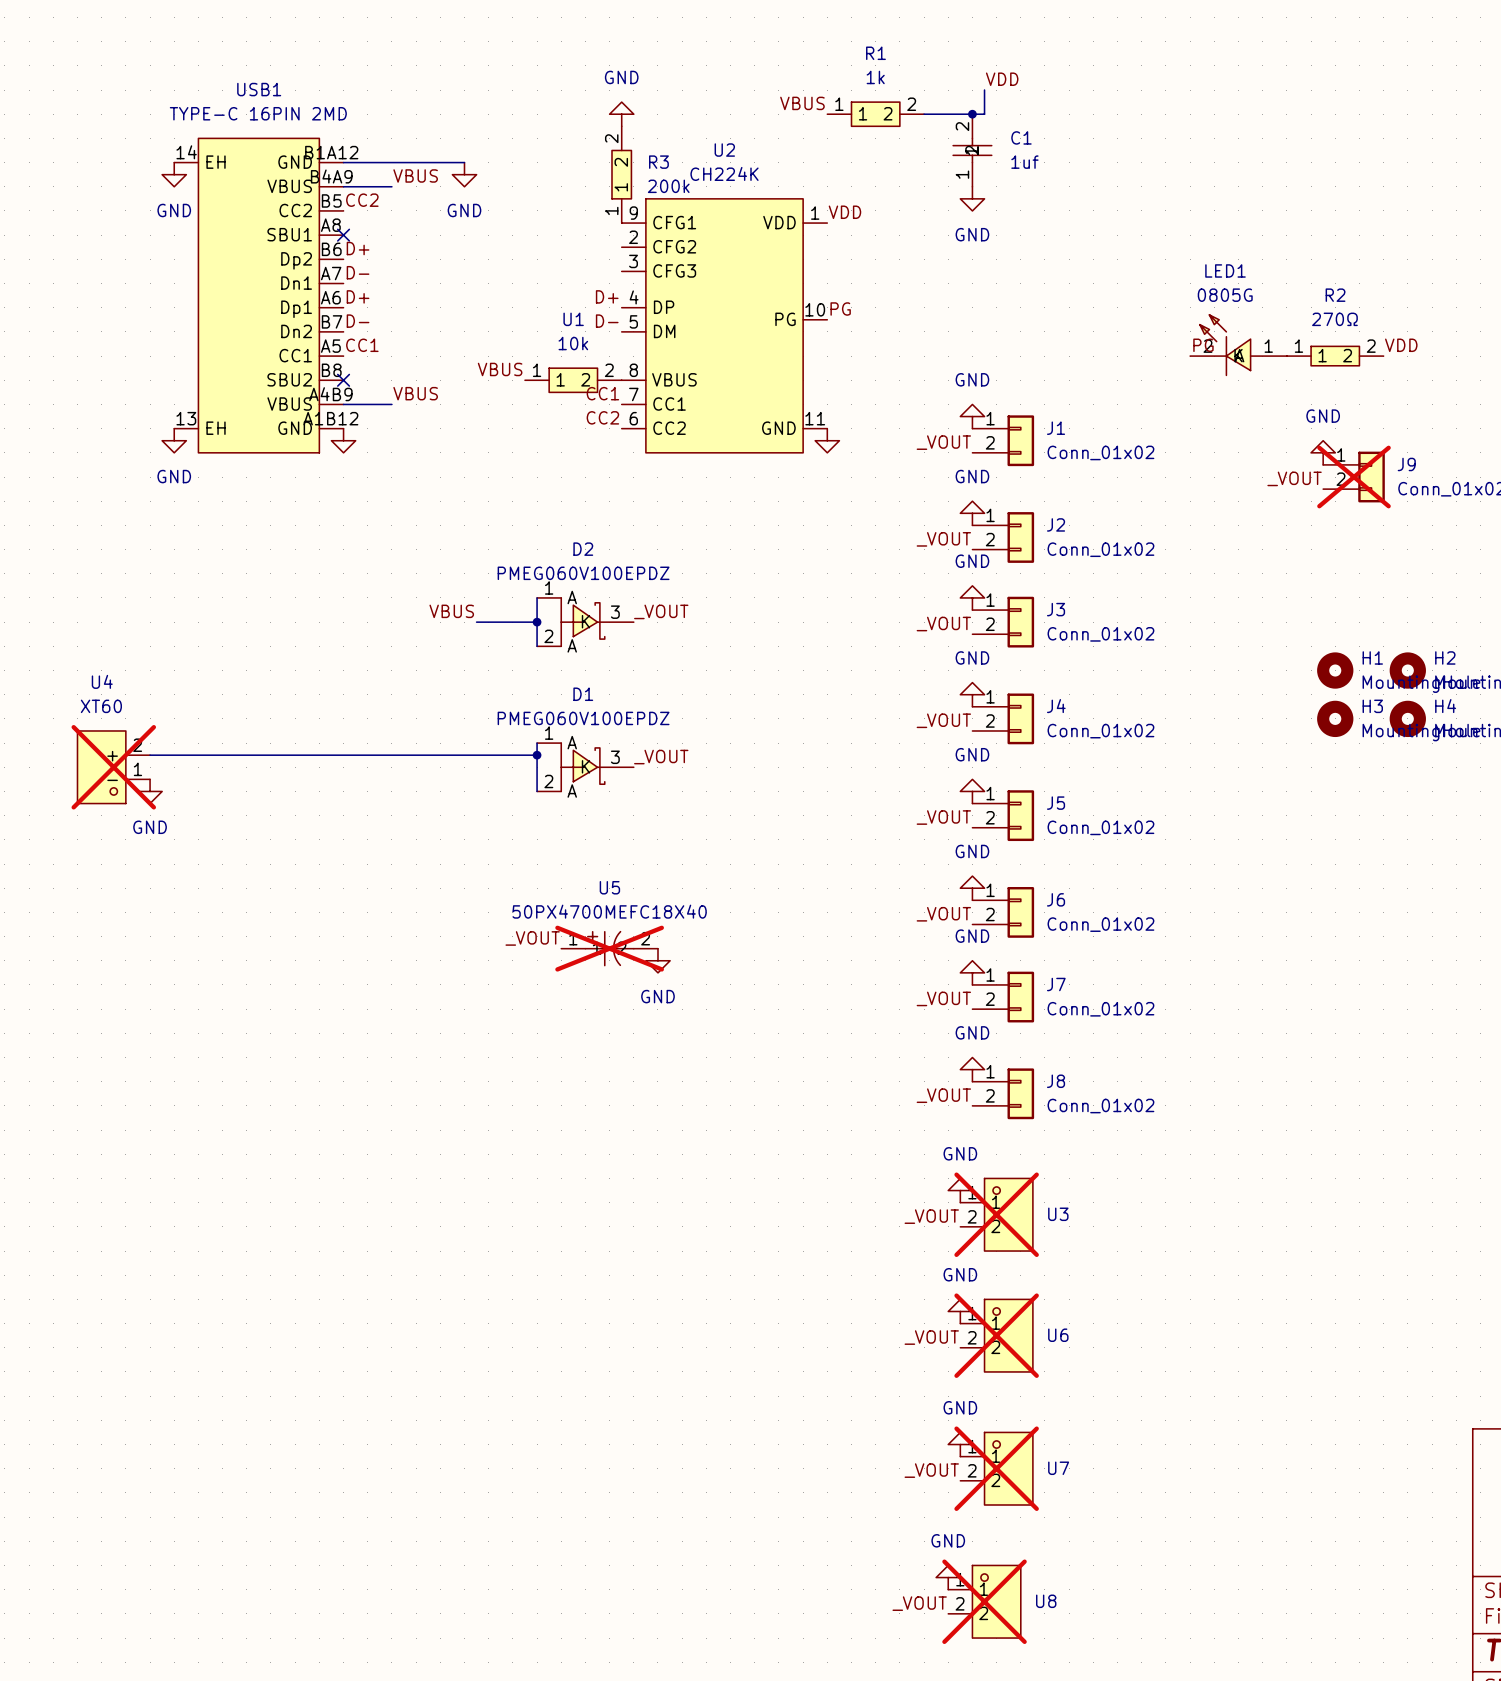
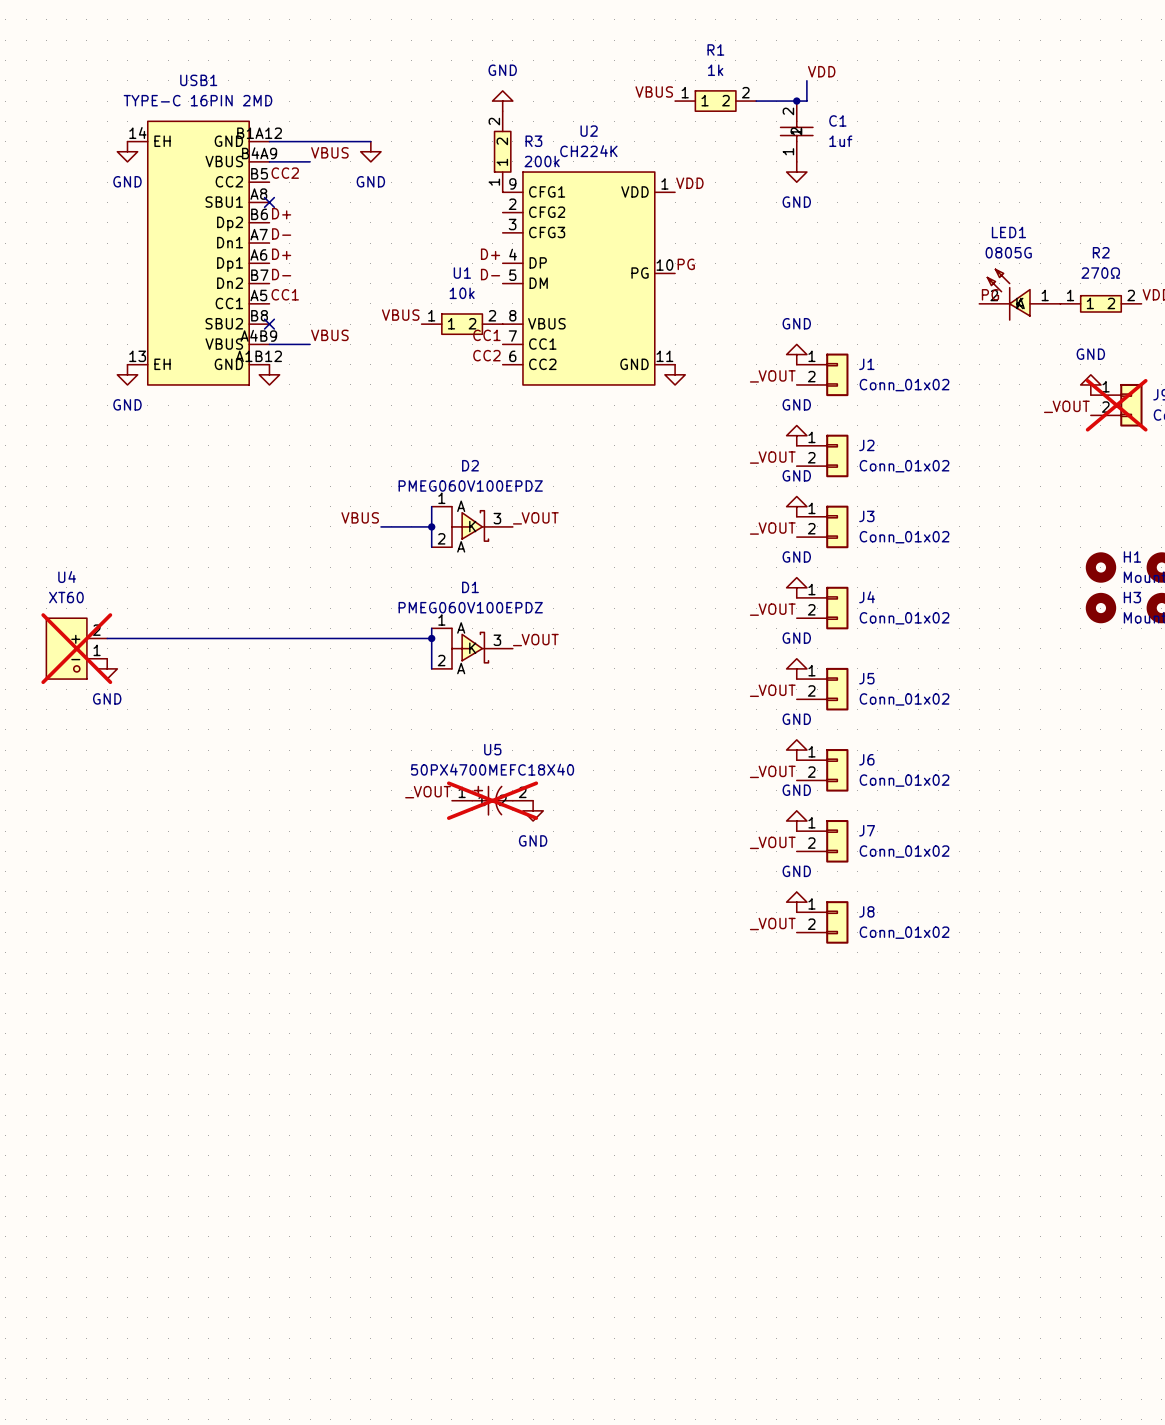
power symbol: GND (960, 1190) -> none
U3: (996, 1214) -> none
label: _VOUT (931, 1216) -> none
power symbol: GND (960, 1311) -> none
U6: (996, 1335) -> none
label: _VOUT (931, 1337) -> none
power symbol: GND (960, 1444) -> none
U7: (996, 1468) -> none
label: _VOUT (931, 1470) -> none
power symbol: GND (948, 1577) -> none
U8: (984, 1601) -> none
label: _VOUT (919, 1603) -> none

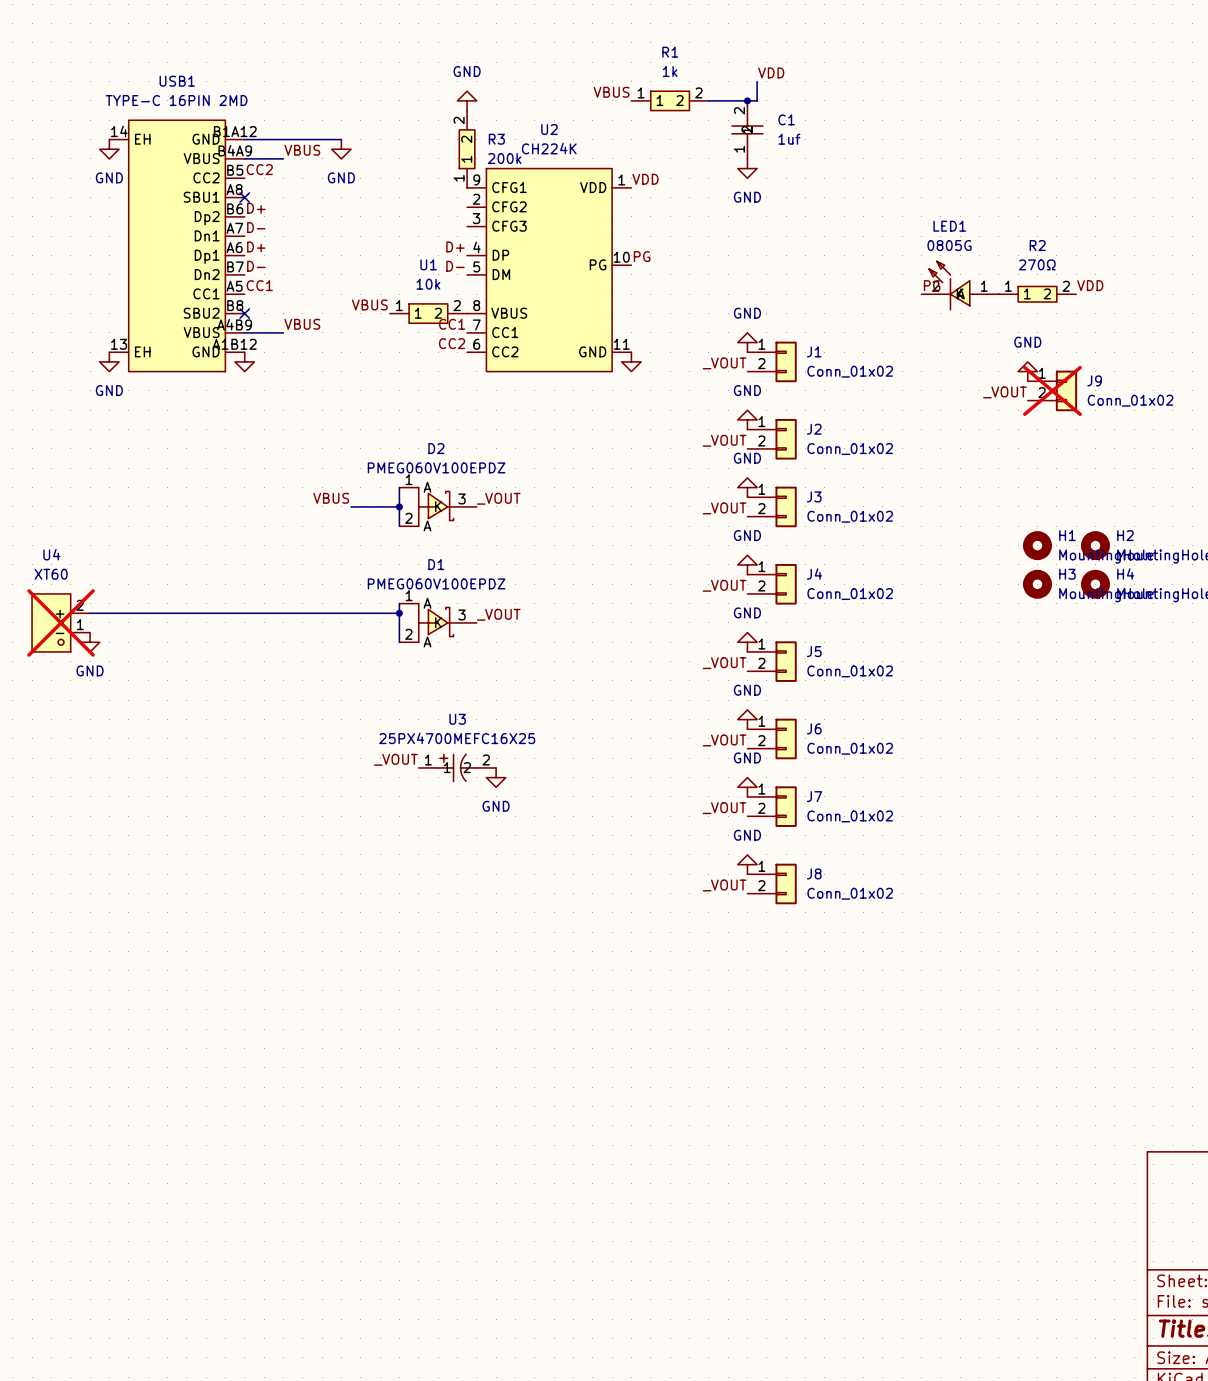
U5 name: U5 (492, 749) -> U3 (457, 719)
U5 value: 50PX4700MEFC18X40 (492, 769) -> 25PX4700MEFC16X25 (457, 738)
U5 do-not-place cross: (492, 800) -> none

